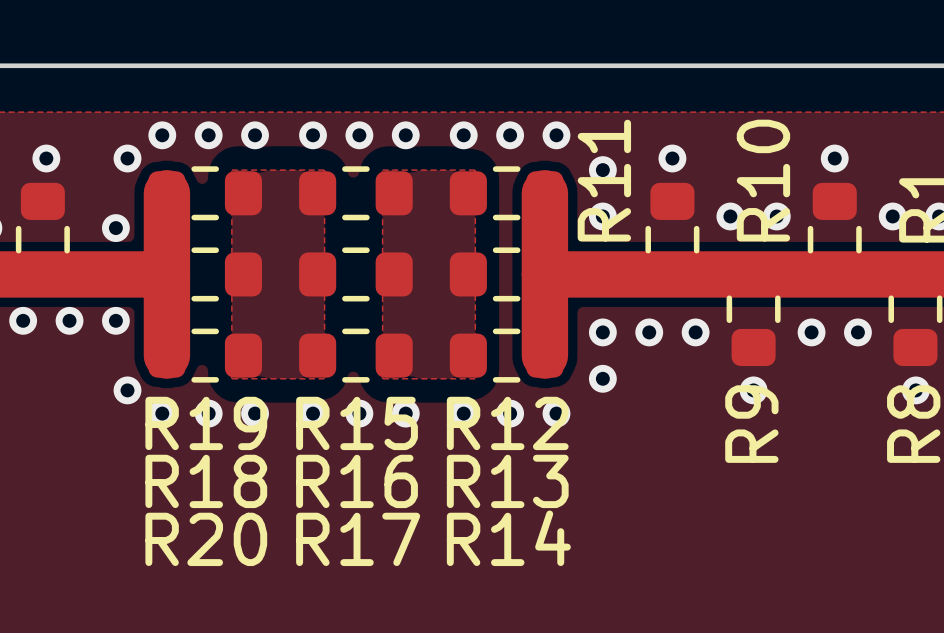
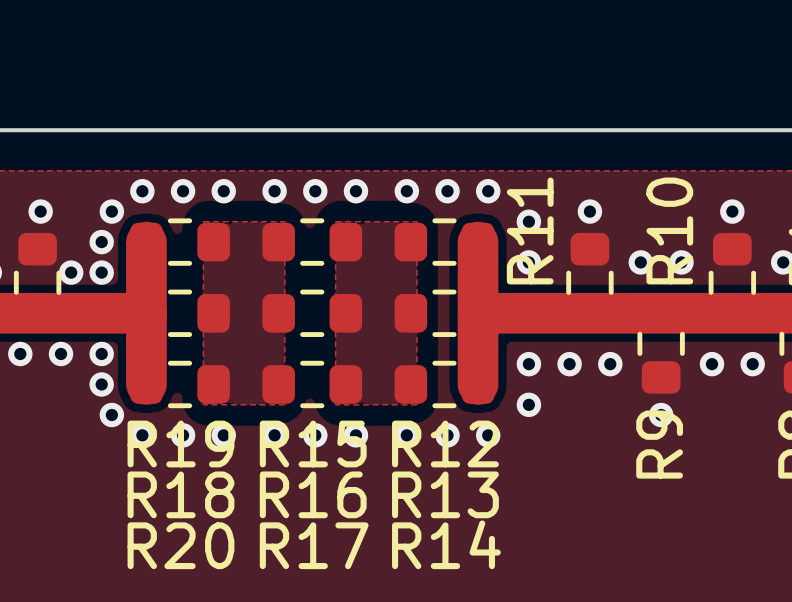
via: none -> (101, 242)
via: none -> (71, 272)
via: none -> (101, 384)

